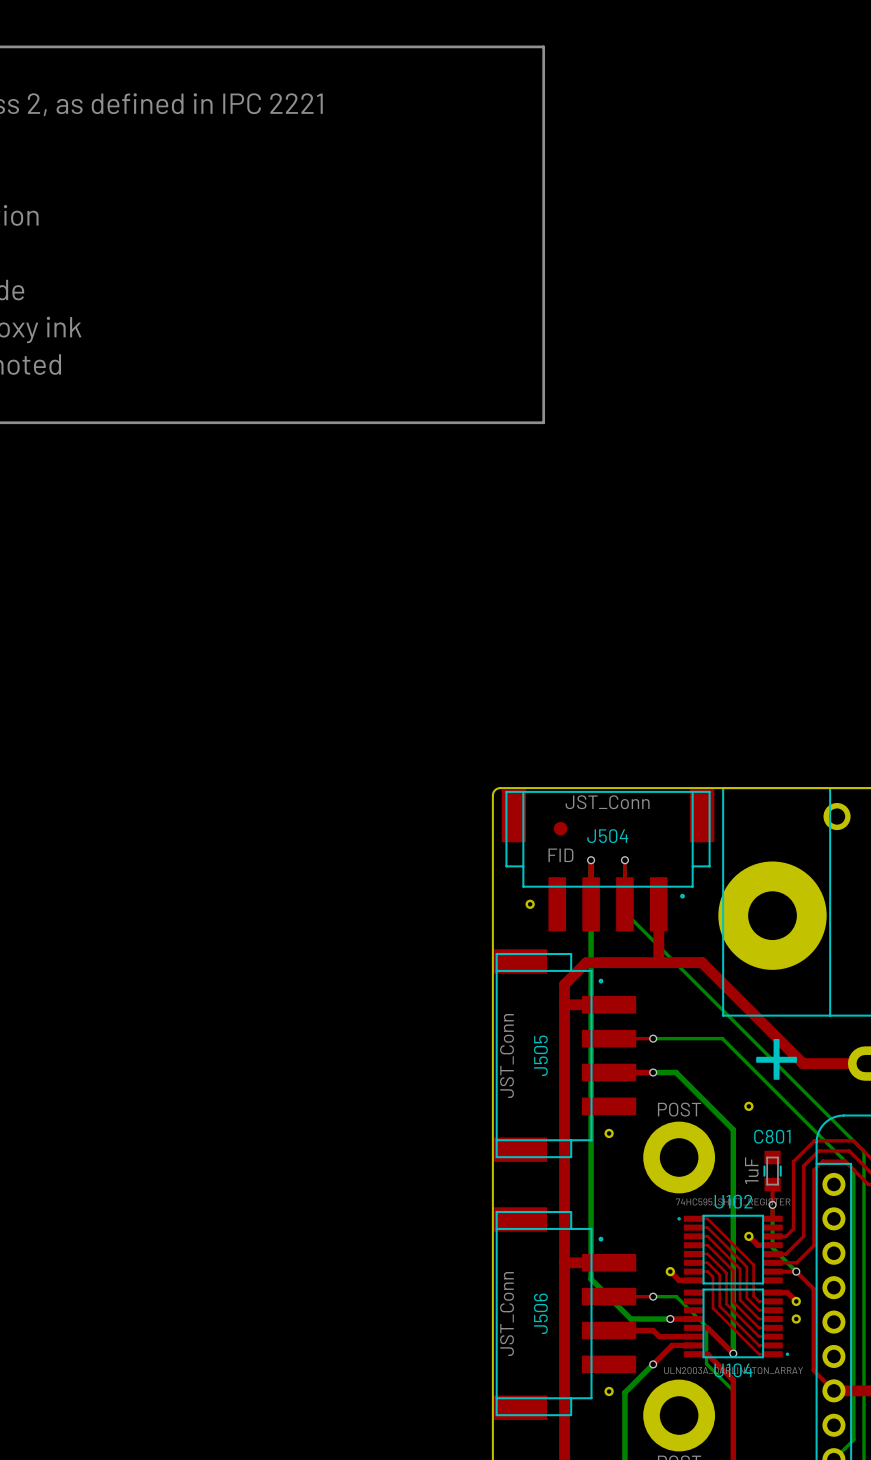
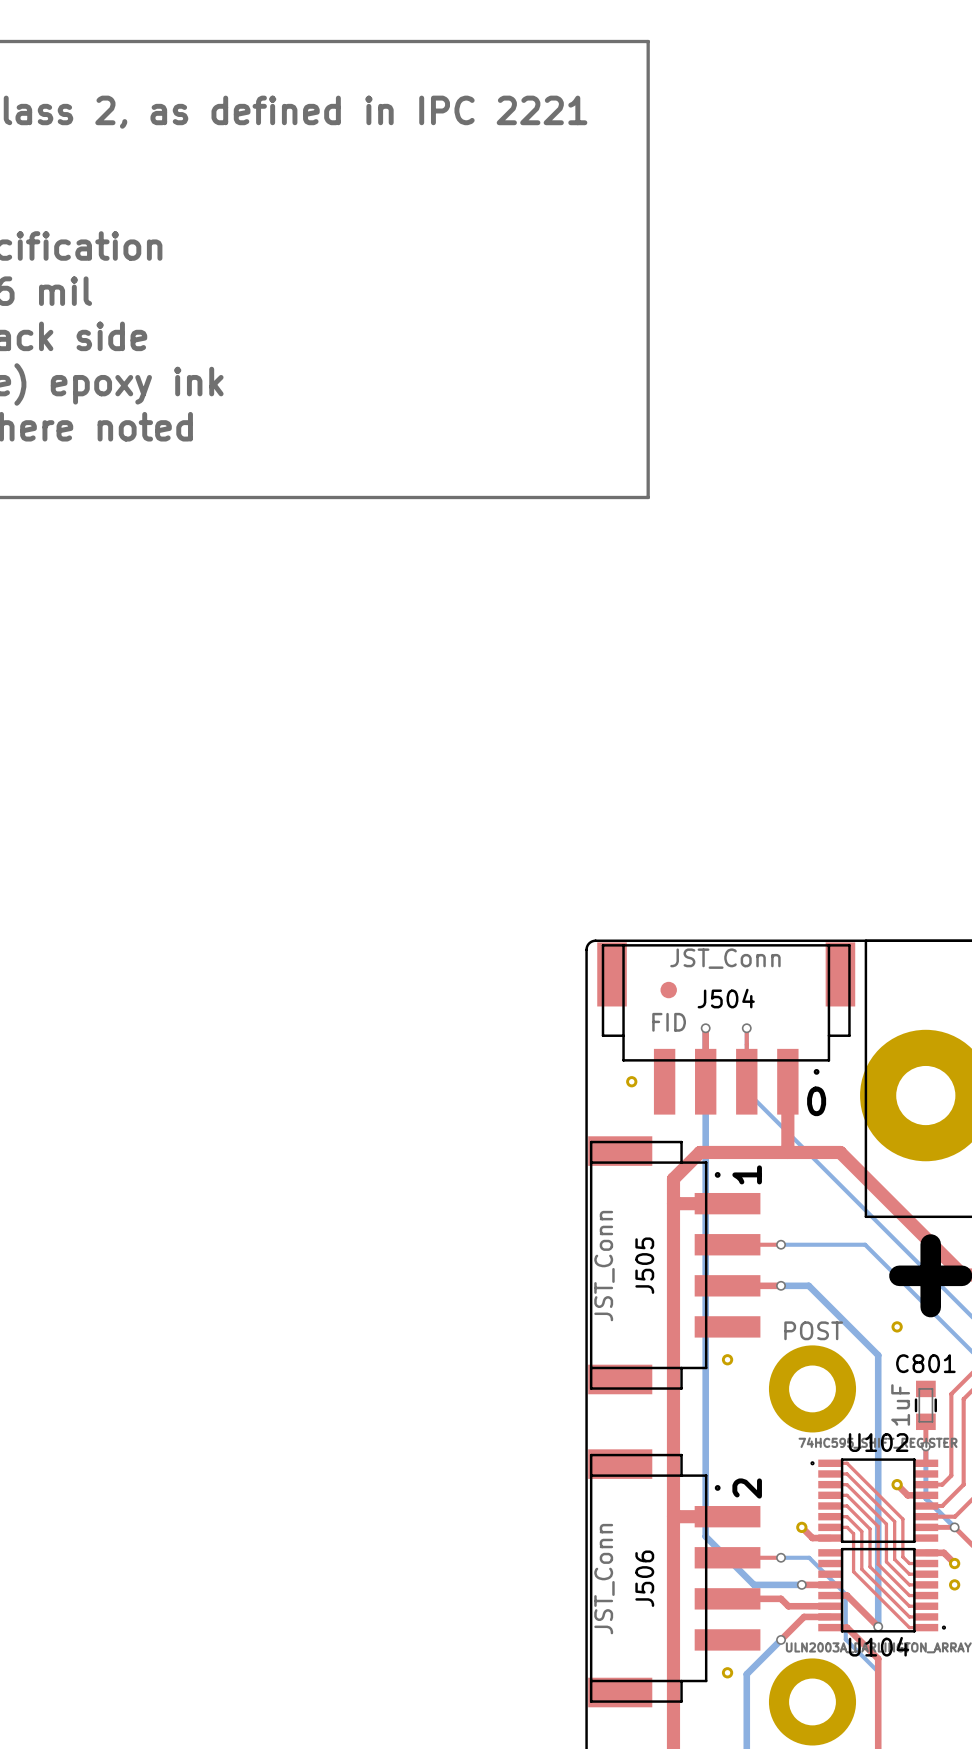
text: none -> 0 (816, 1101)
text: none -> 1 (747, 1174)
text: none -> 2 (747, 1488)

